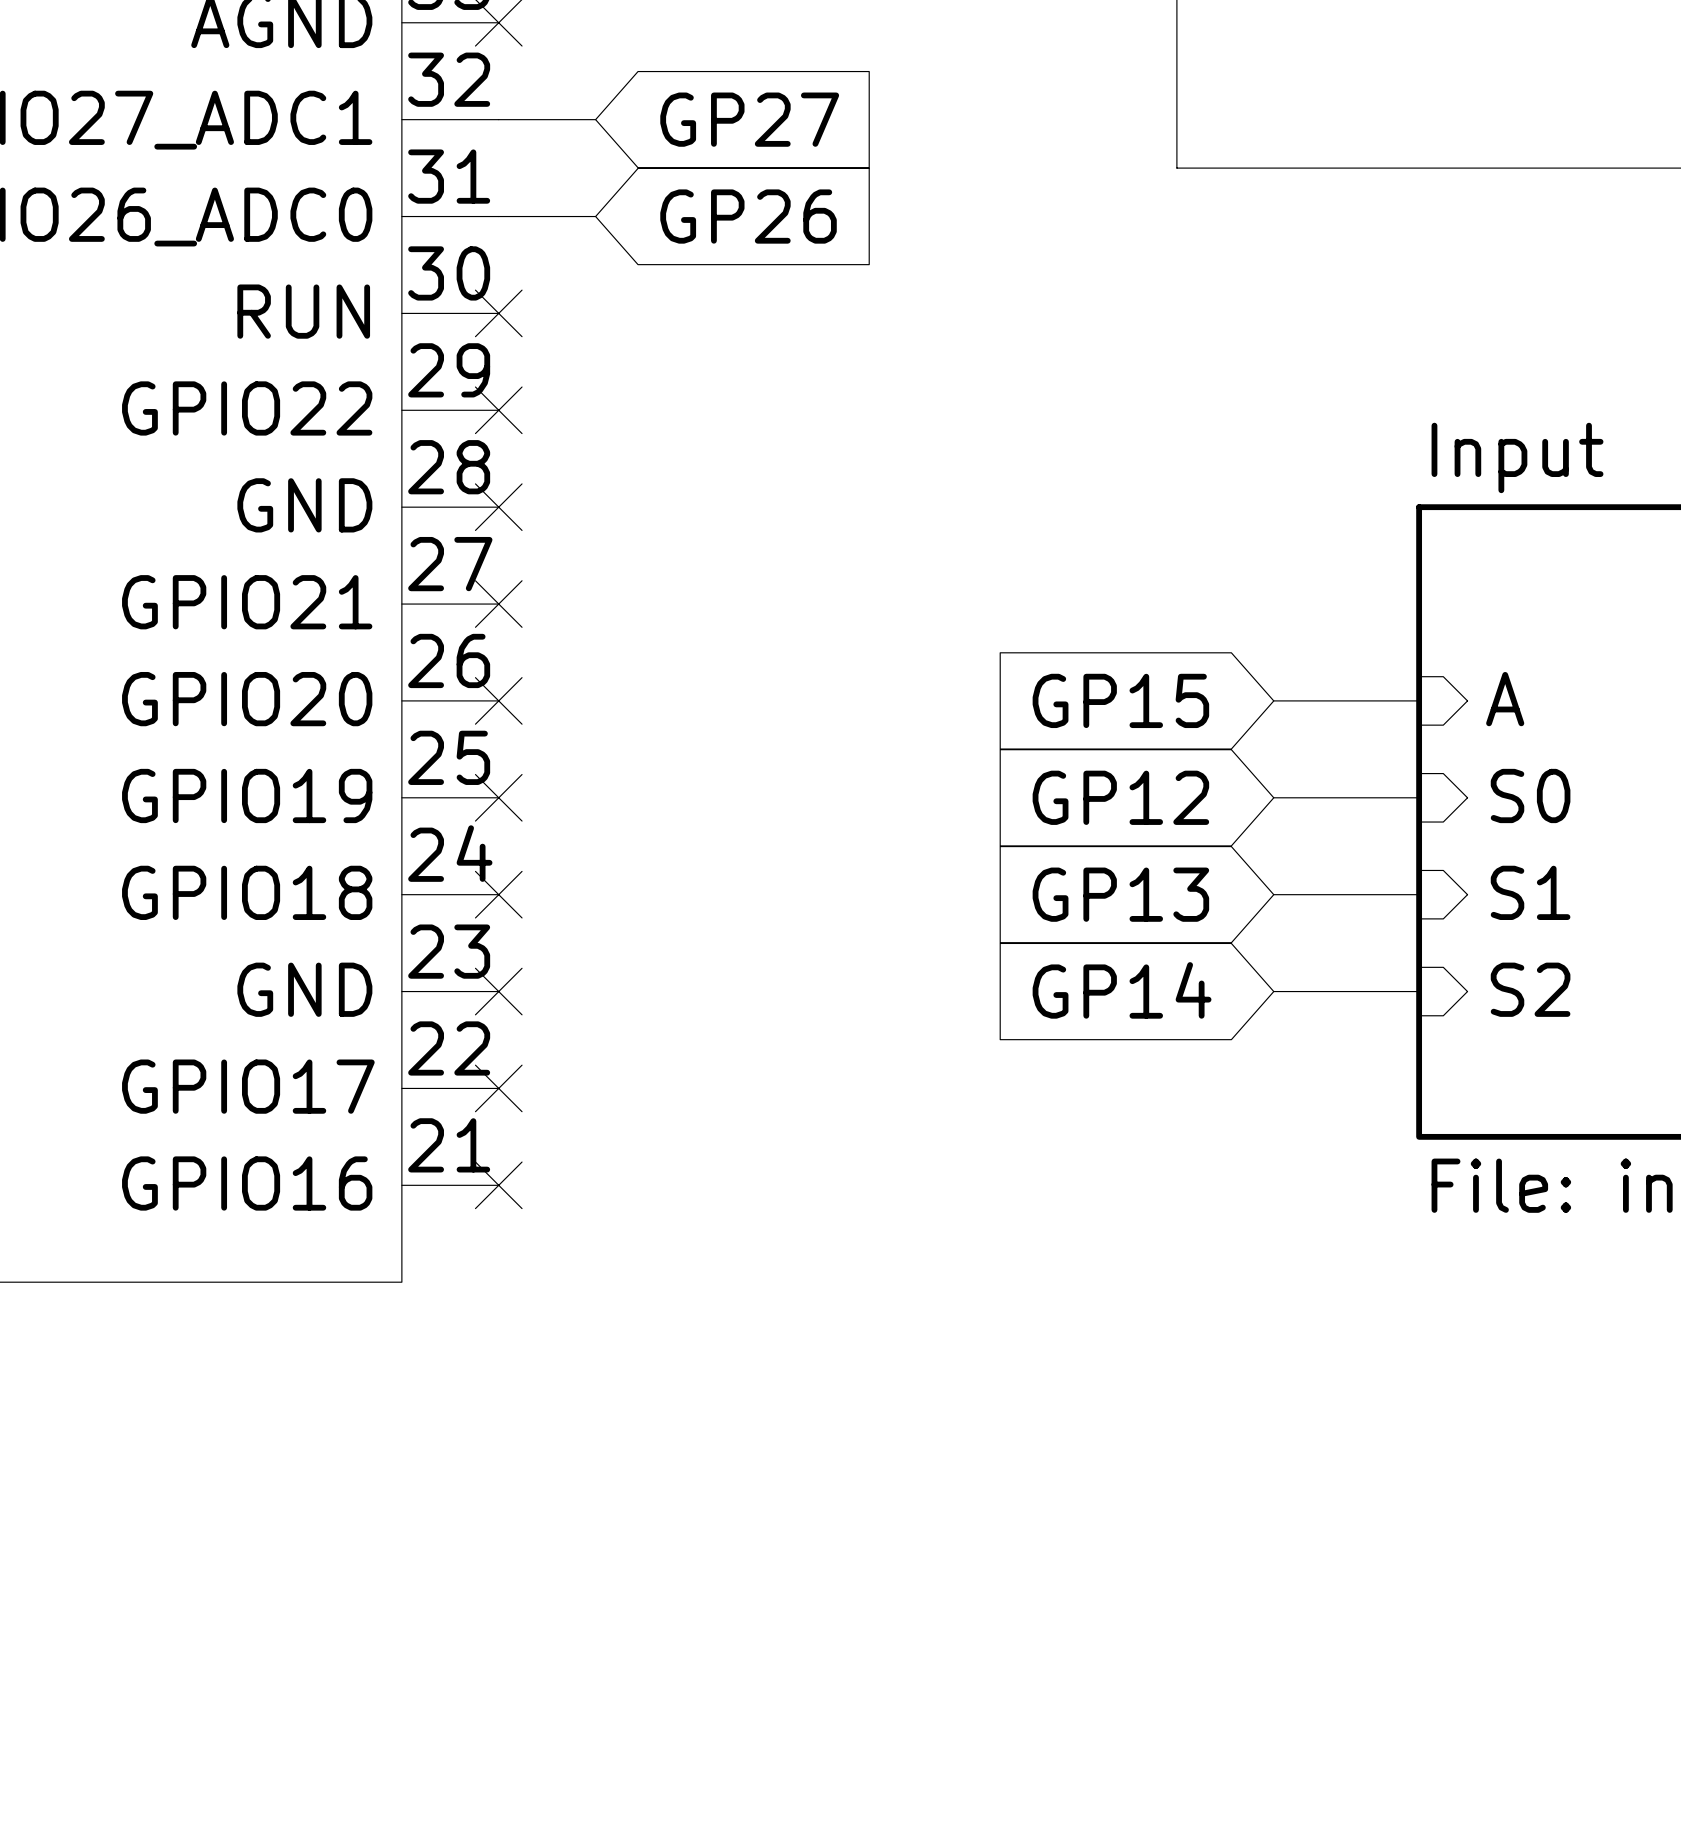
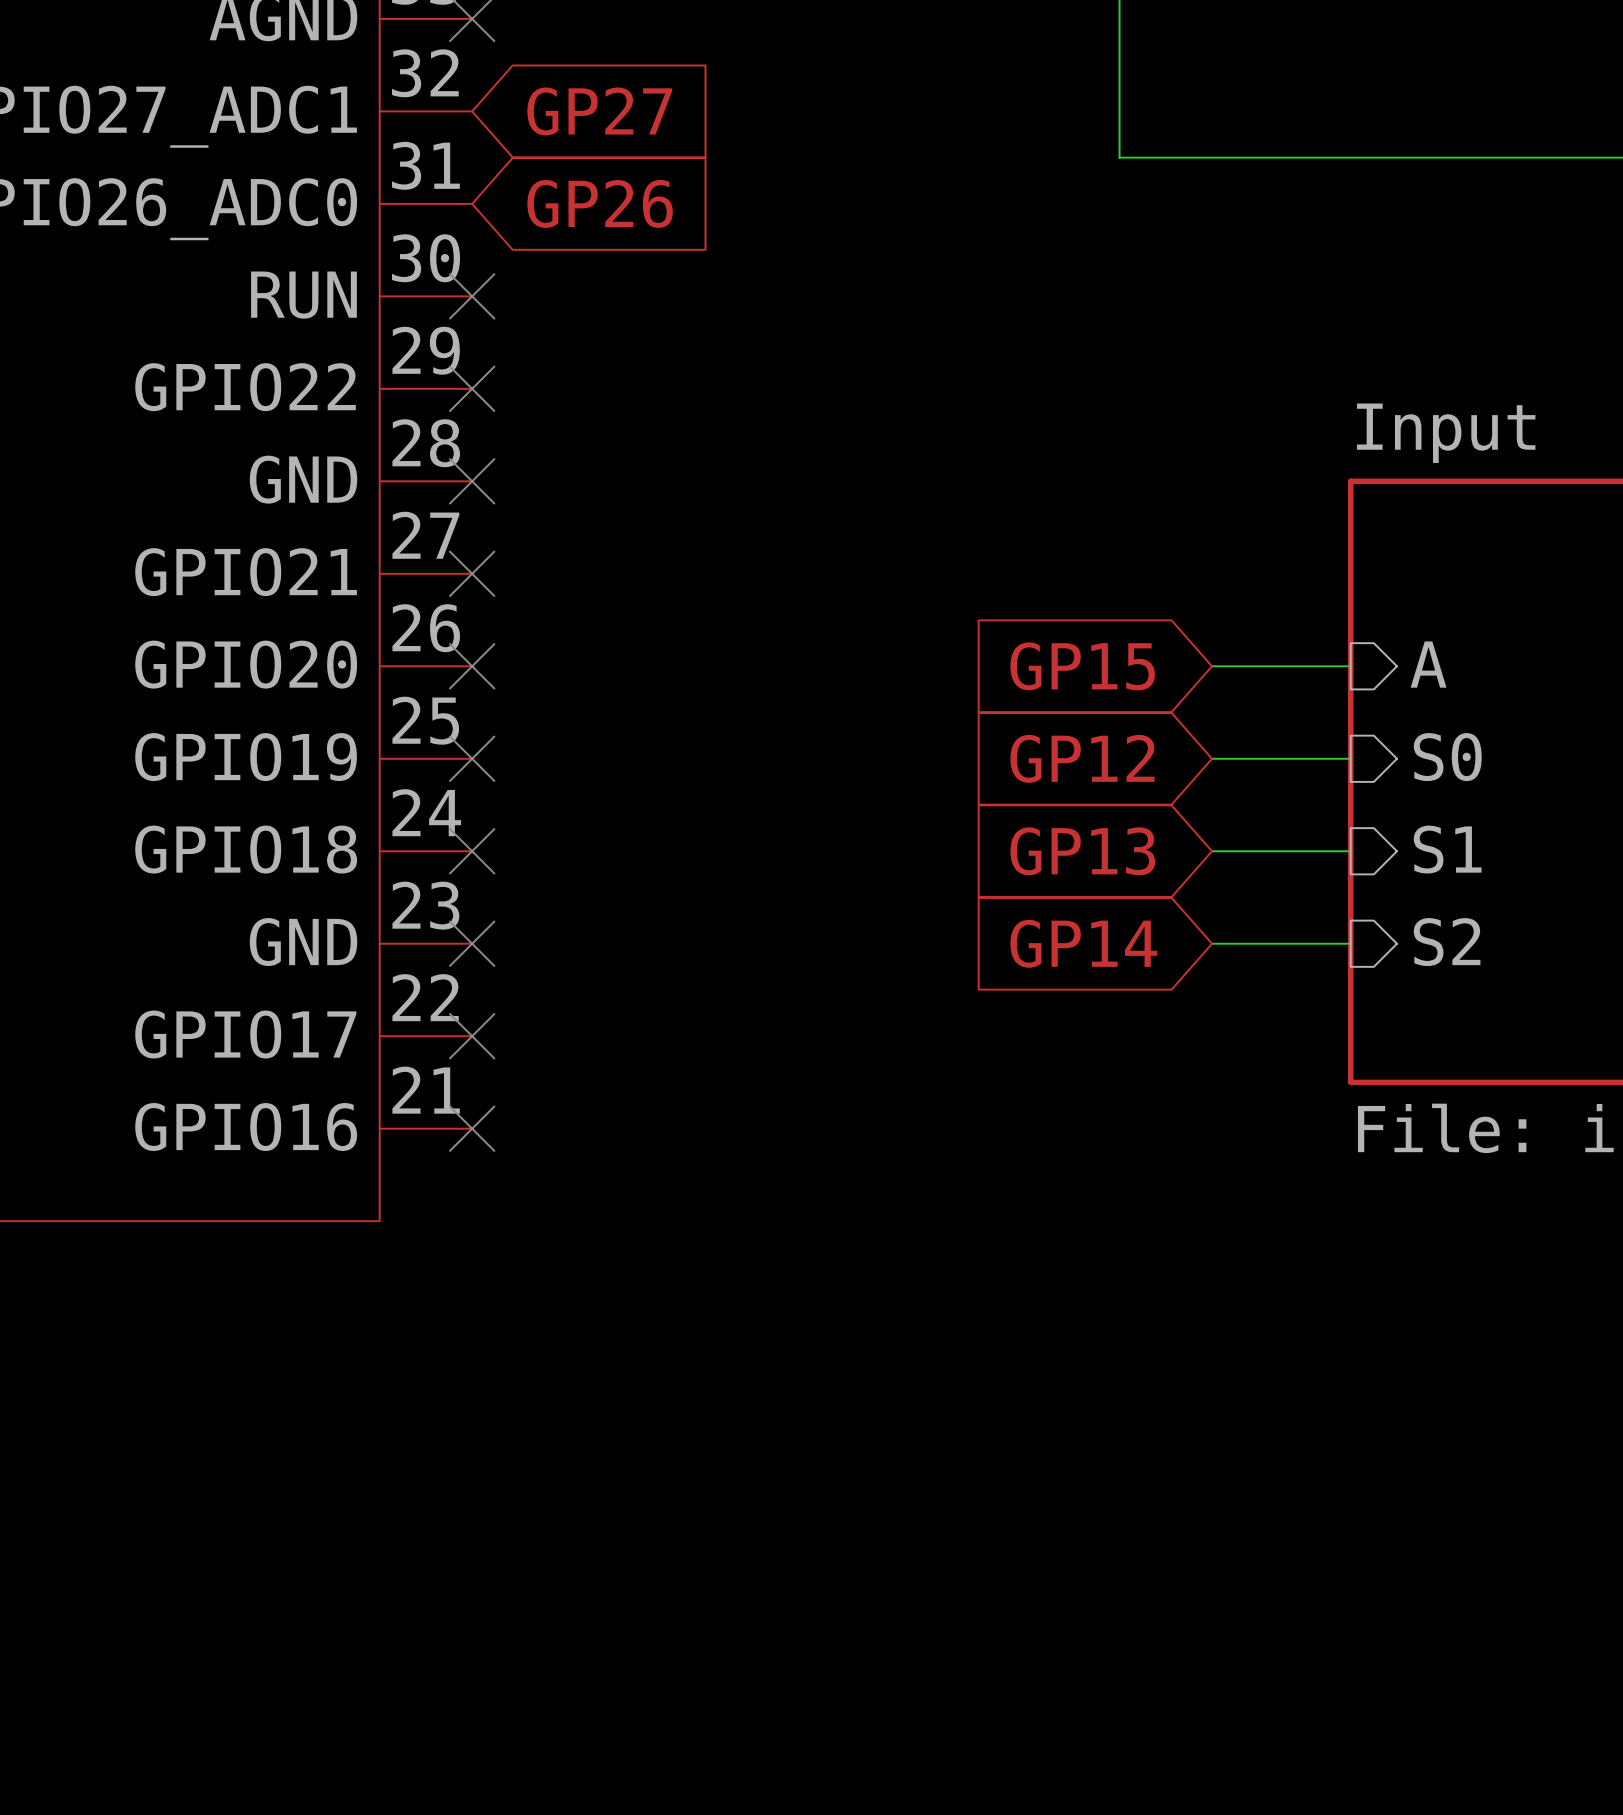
wire: (498, 119) (595, 119) -> none
global label position: GP27 (749, 119) -> GP27 (599, 111)
wire: (498, 216) (595, 216) -> none
global label position: GP26 (748, 216) -> GP26 (600, 203)

